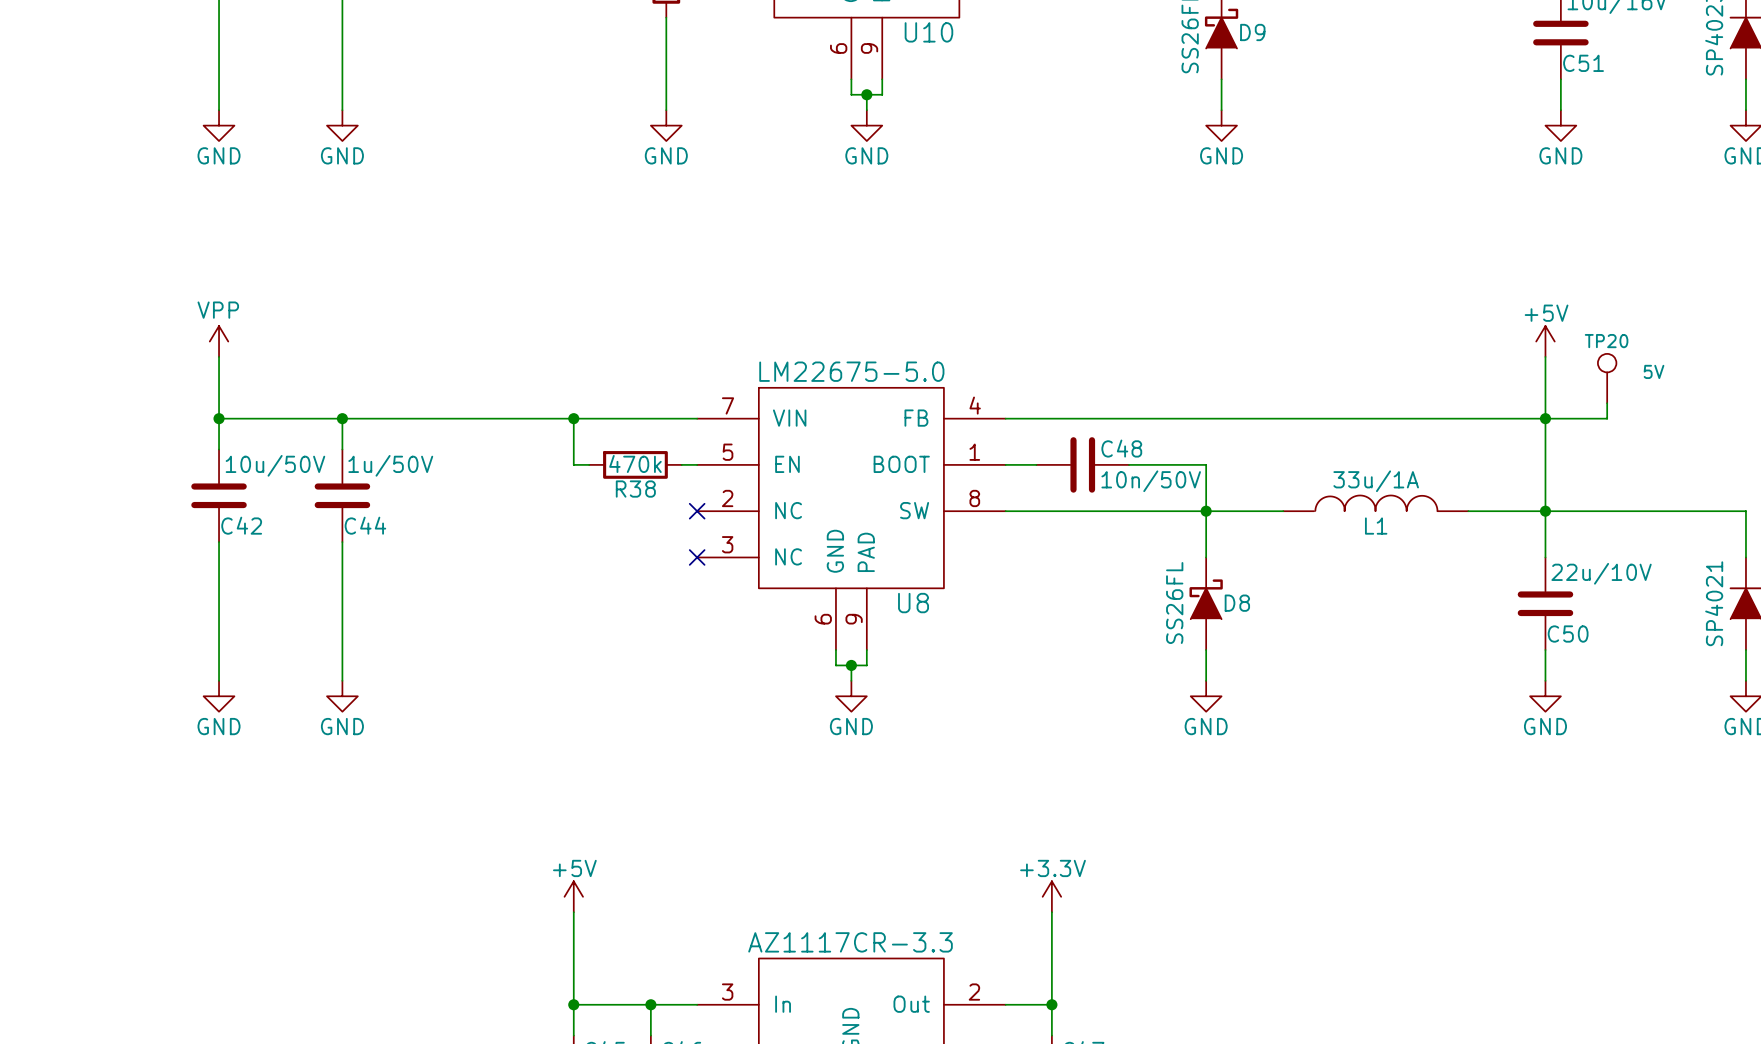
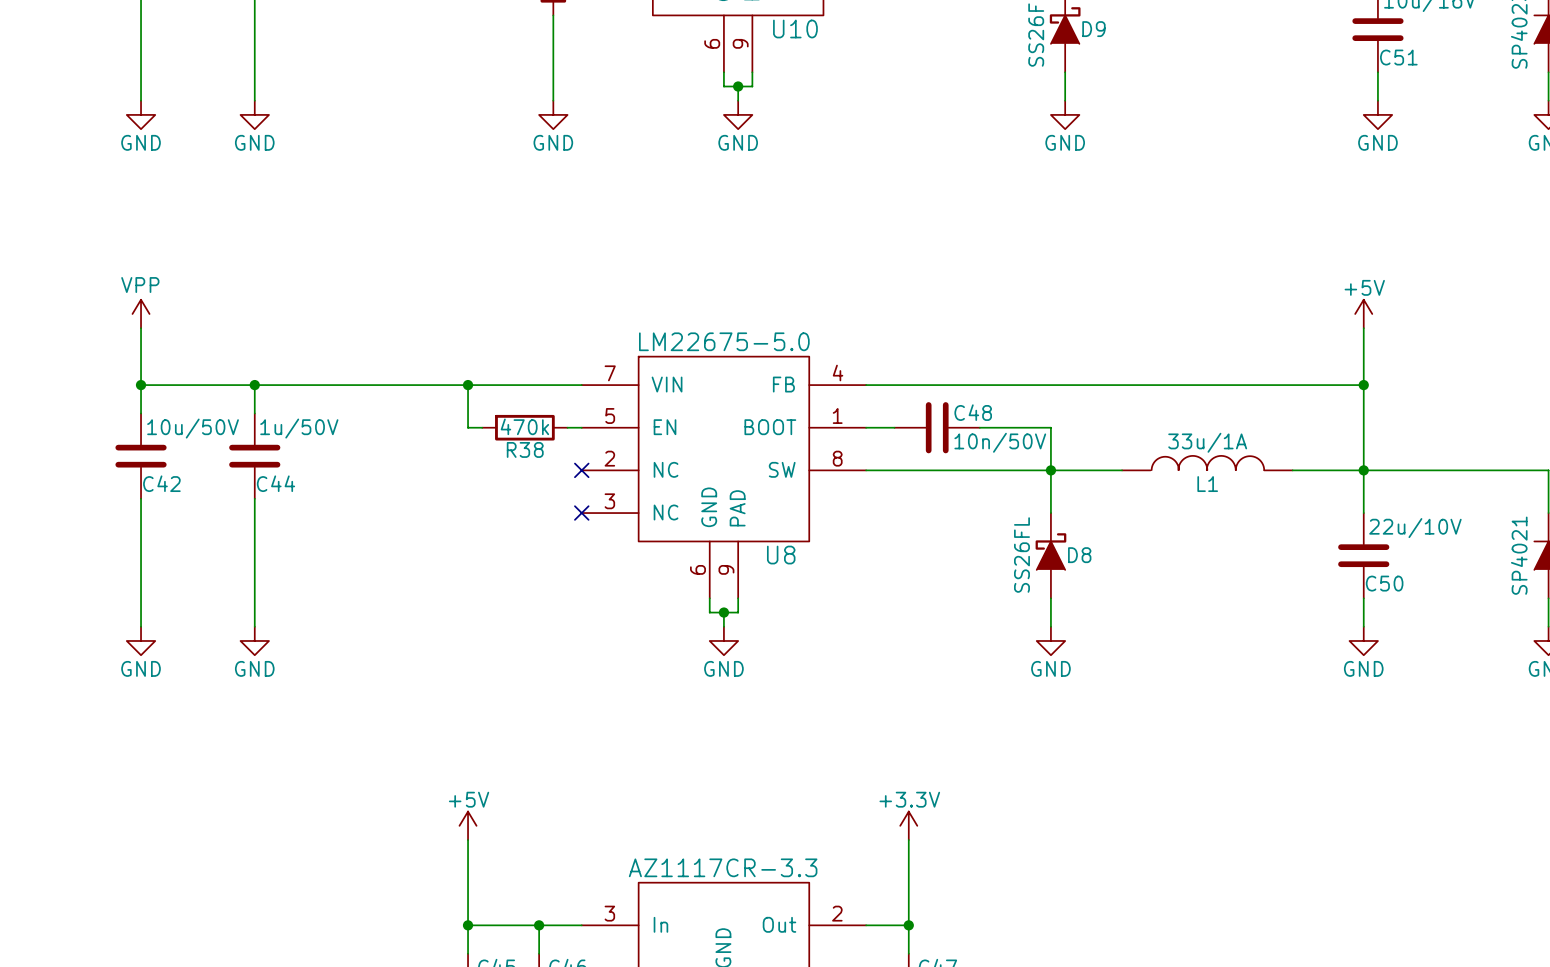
TP20: 5V (1607, 378) -> none
wire: (1607, 403) (1607, 418) (1545, 418) -> none

